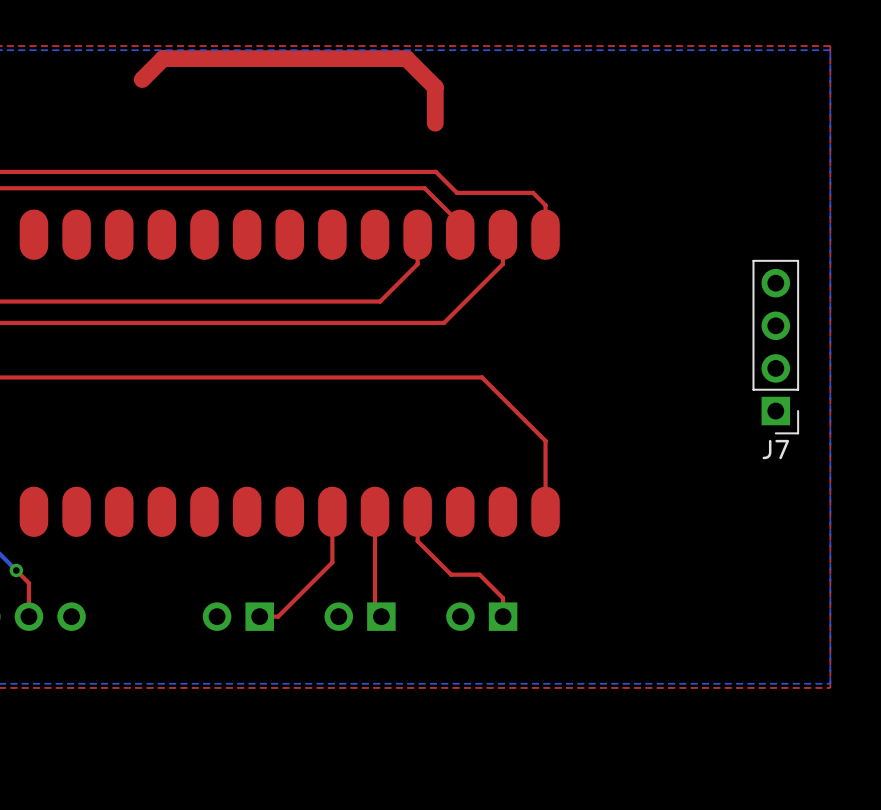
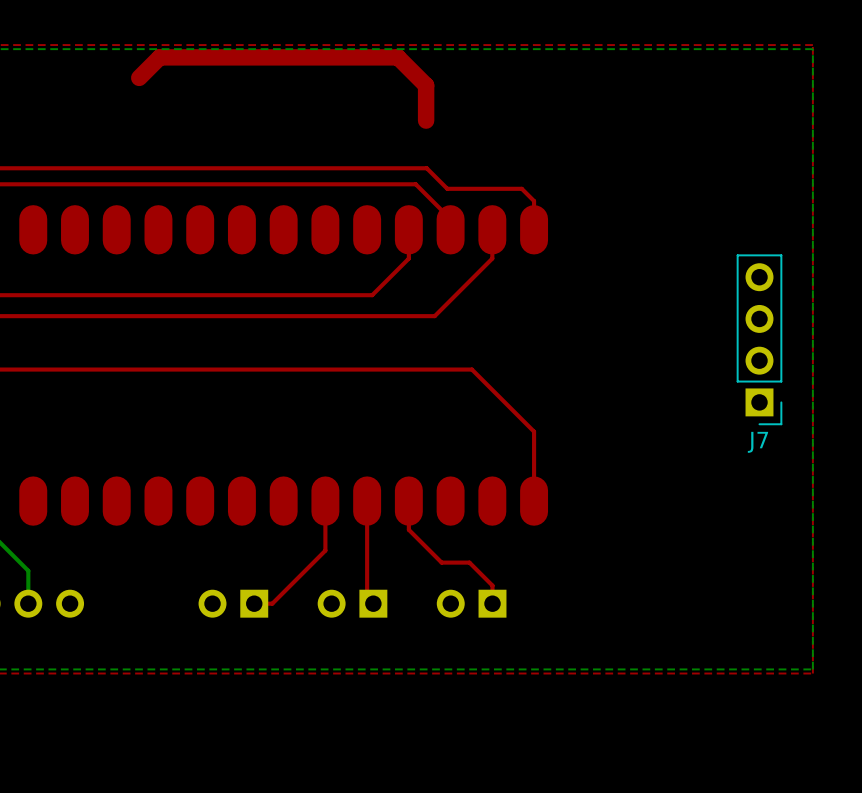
bottom track: none -> (16, 558) (28, 570) (28, 603)
top track: (16, 570) (28, 583) (28, 616) -> none
via: (16, 570) -> none

